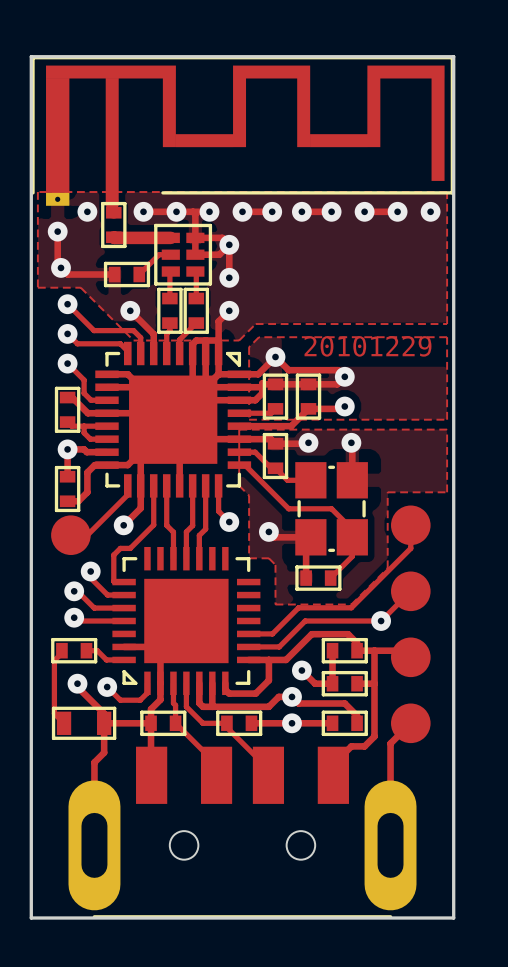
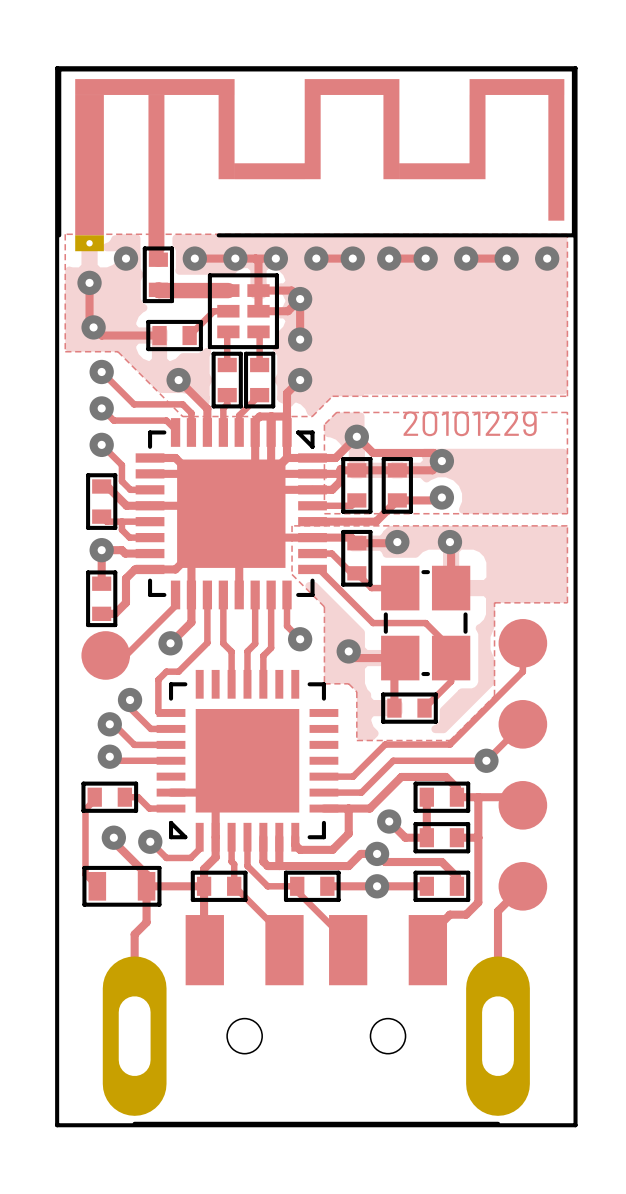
zone outline: (239, 429) (239, 485) -> (312, 525) (292, 525) (292, 574) (312, 594)

